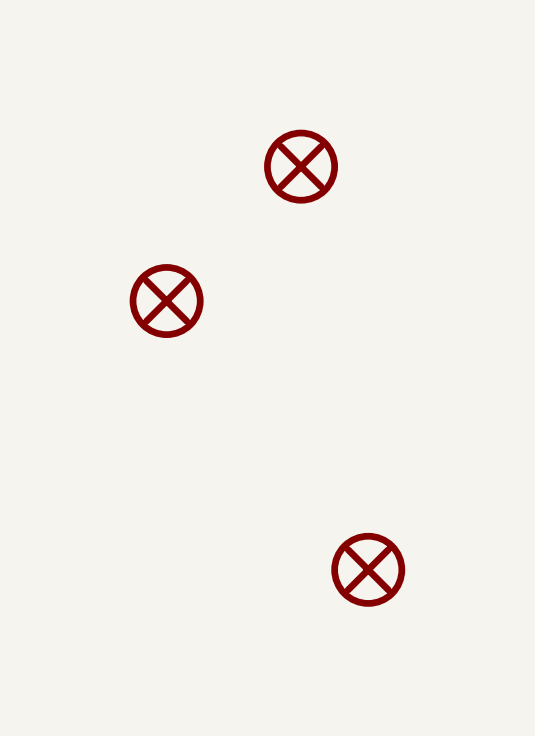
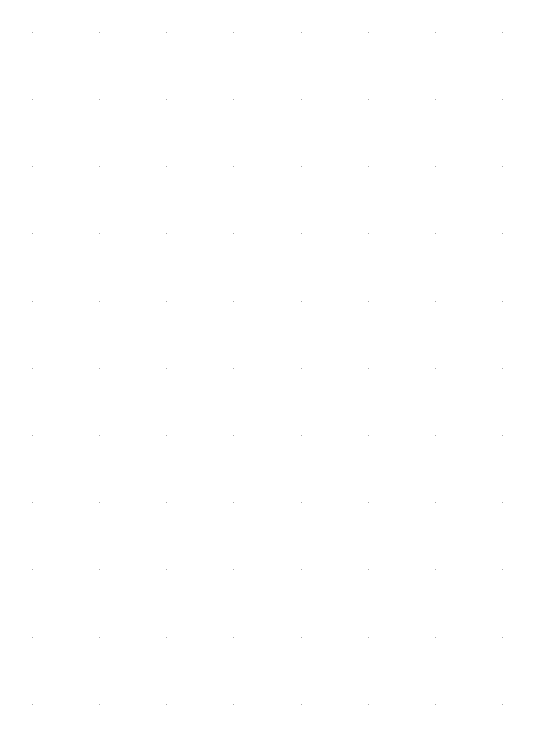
part: (301, 166) -> none
part: (166, 301) -> none
part: (368, 569) -> none

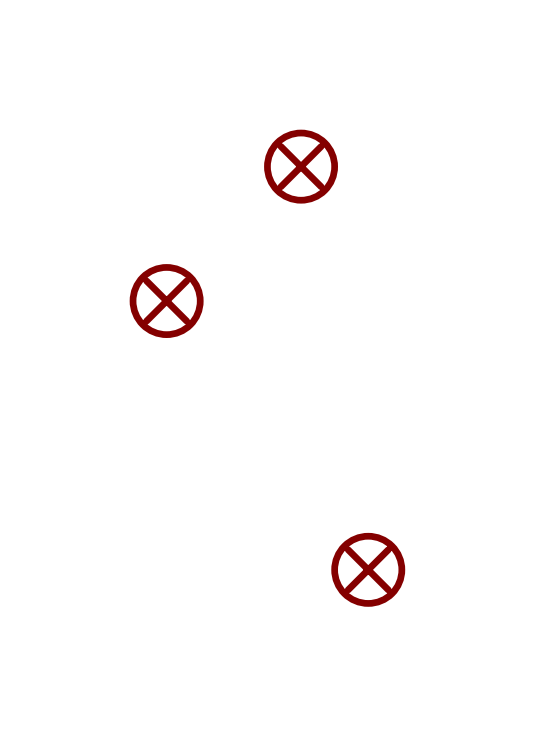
part: none -> (301, 166)
part: none -> (166, 301)
part: none -> (368, 569)

